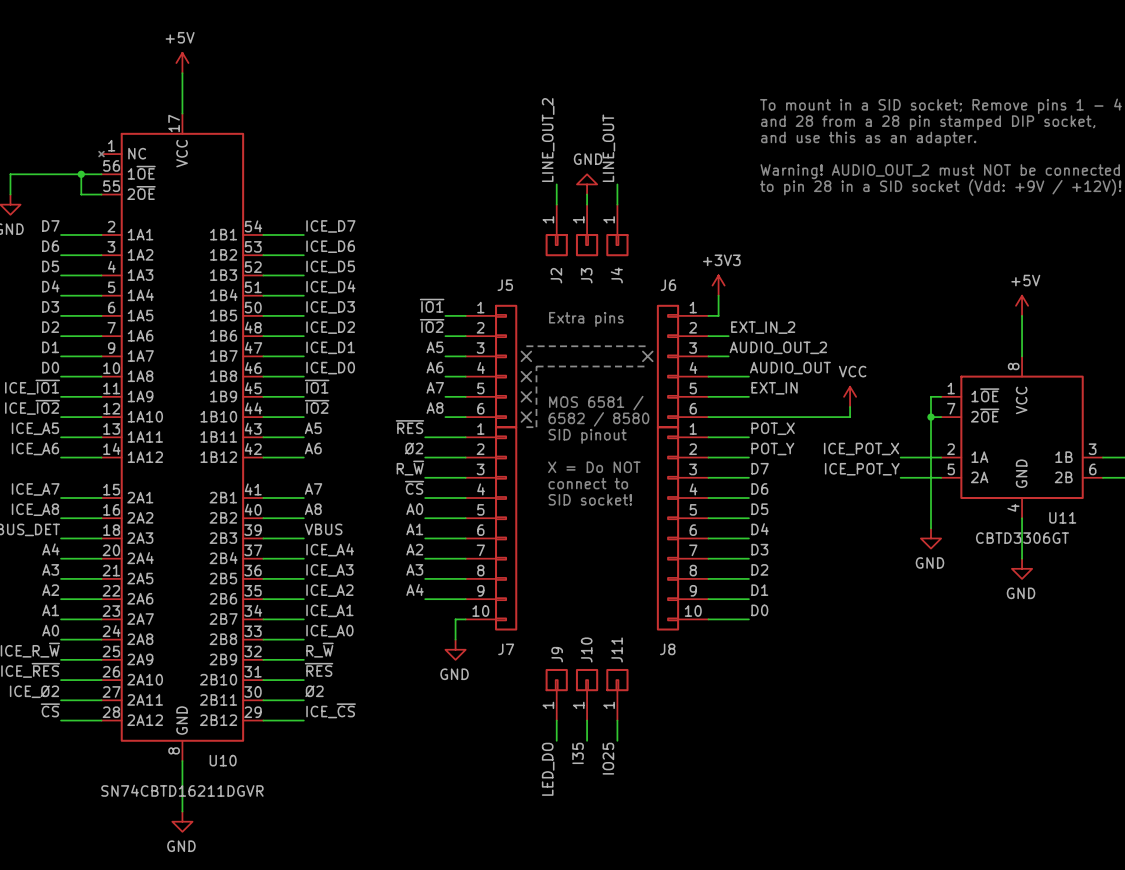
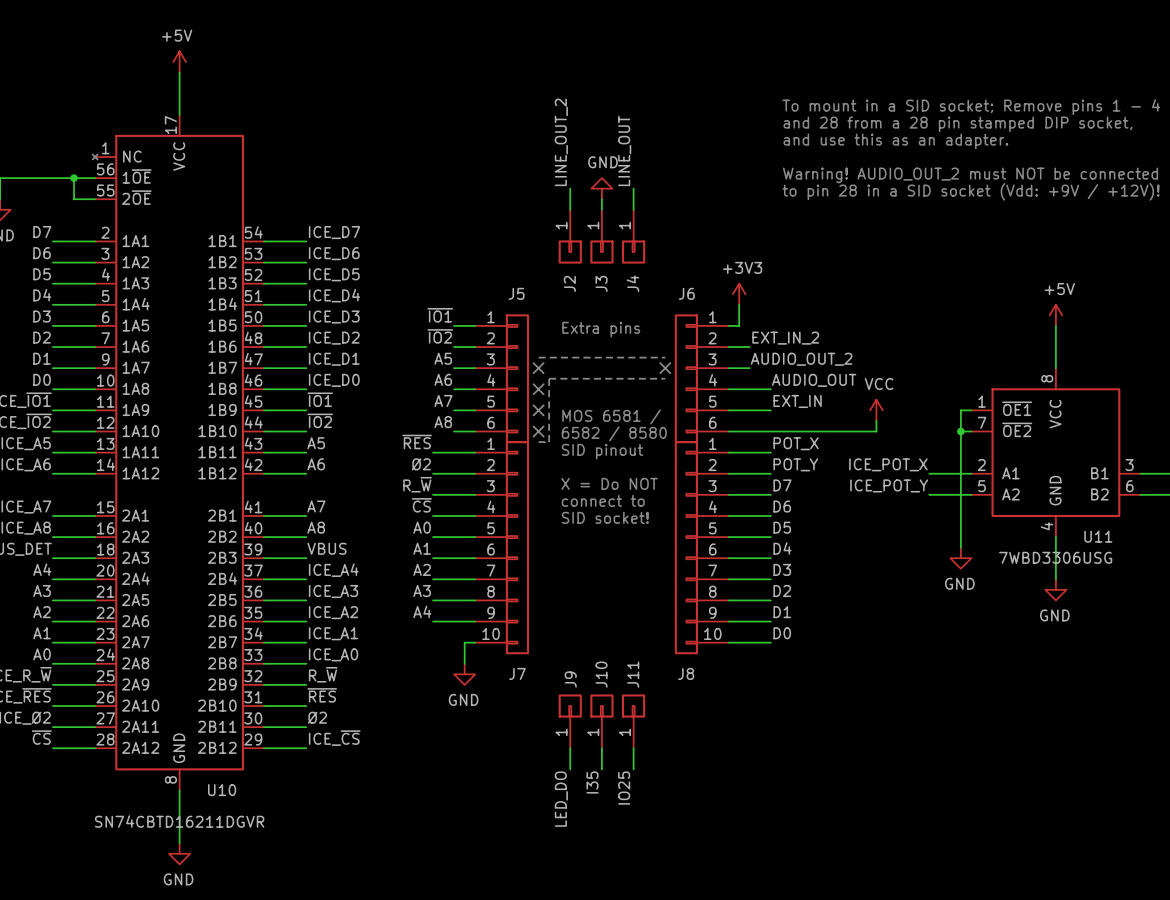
U11 pin name: 1~{OE} (985, 395) -> ~{OE1} (1017, 408)
U11 pin name: 2~{OE} (985, 415) -> ~{OE2} (1017, 429)
U11 pin name: 1A (979, 457) -> A1 (1010, 473)
U11 pin name: 1B (1063, 457) -> B1 (1099, 473)
U11 pin name: 2A (979, 477) -> A2 (1010, 494)
U11 pin name: 2B (1063, 477) -> B2 (1099, 494)
U11 value: CBTD3306GT (1022, 538) -> 7WBD3306USG (1055, 557)

